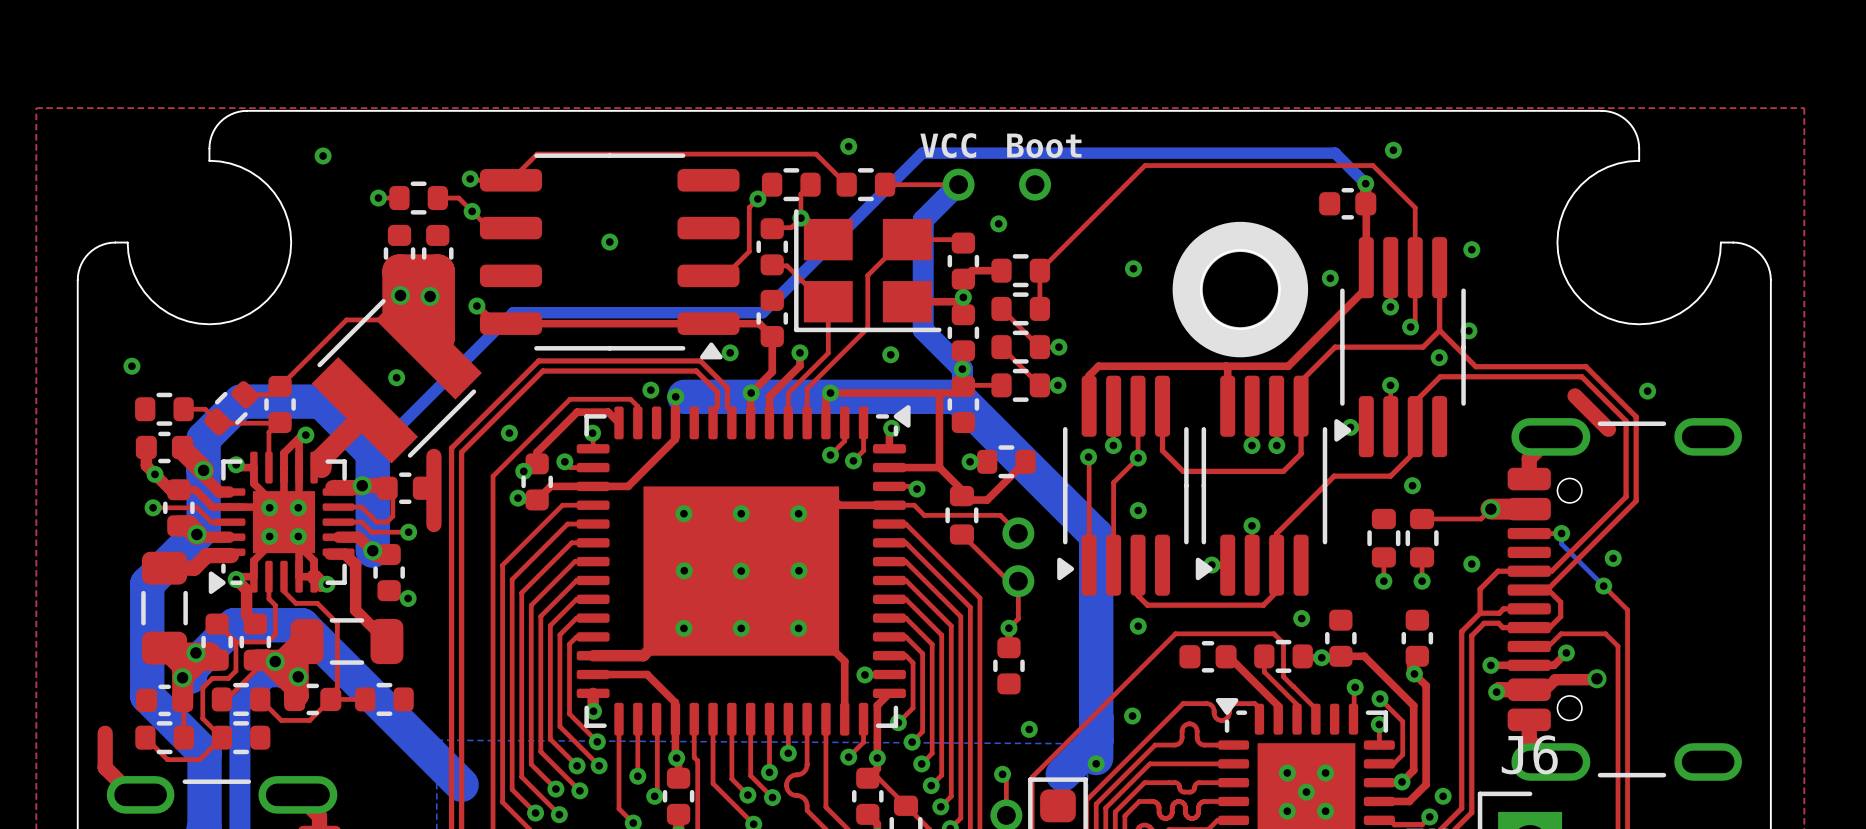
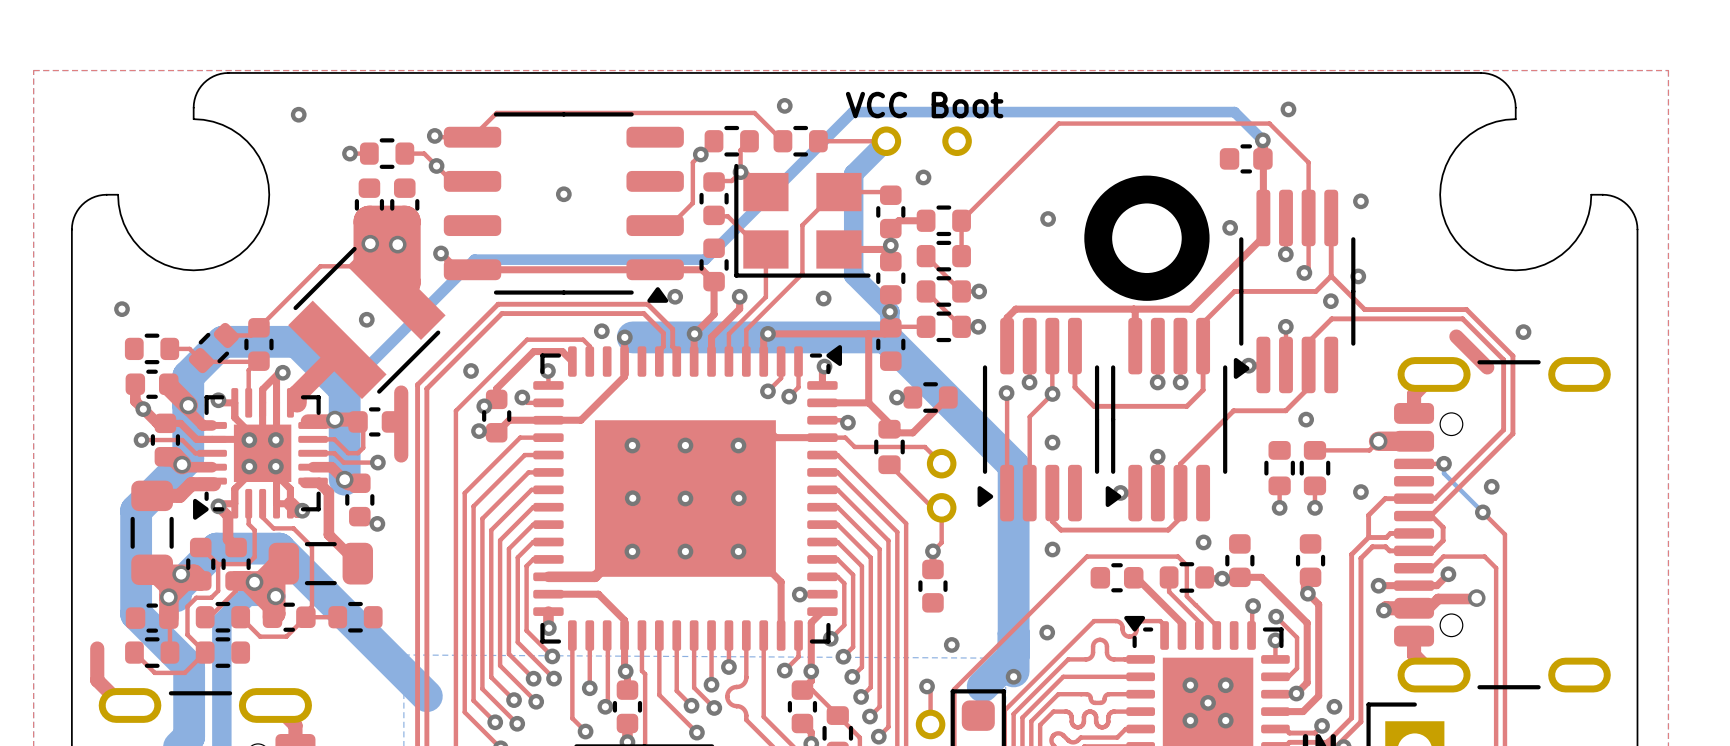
J6 name: J6 (1529, 754) -> none

